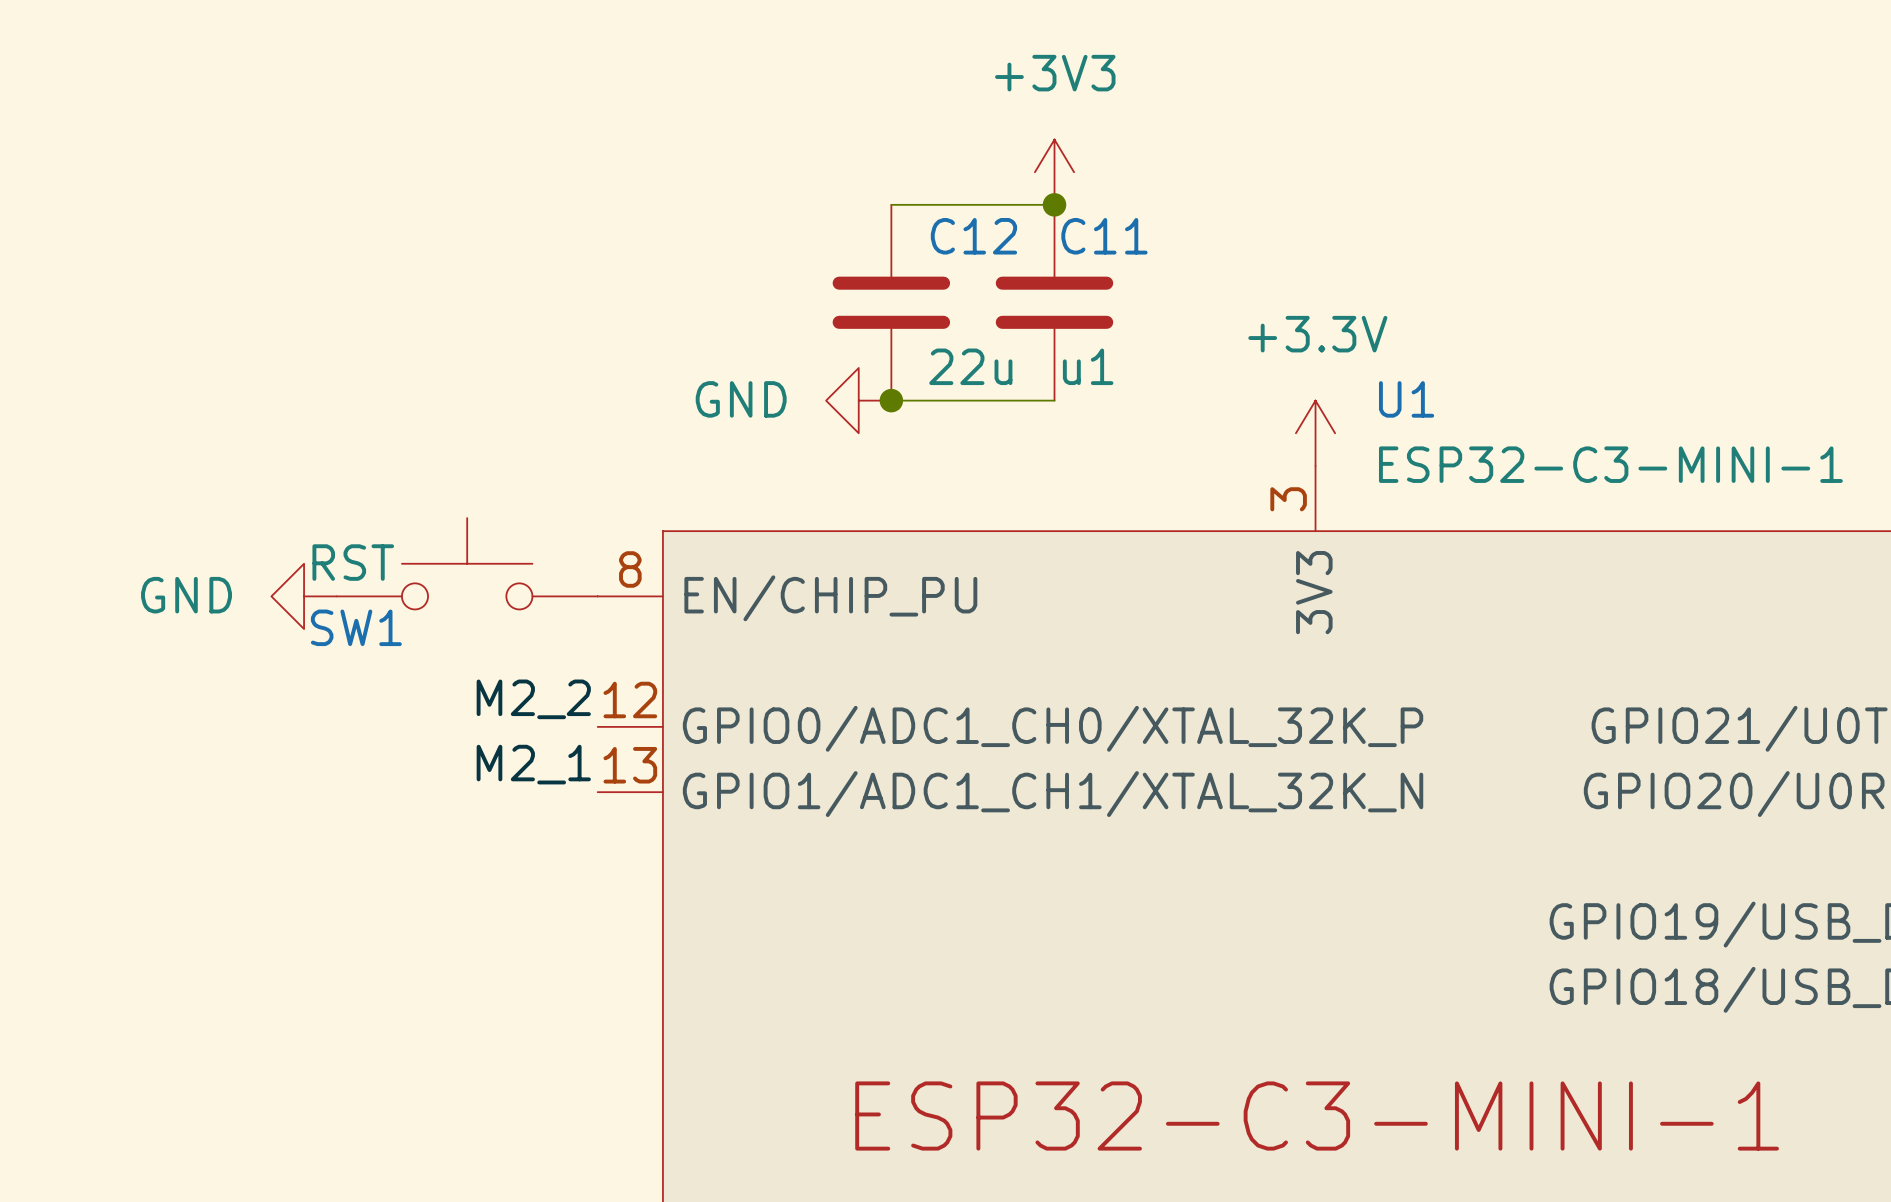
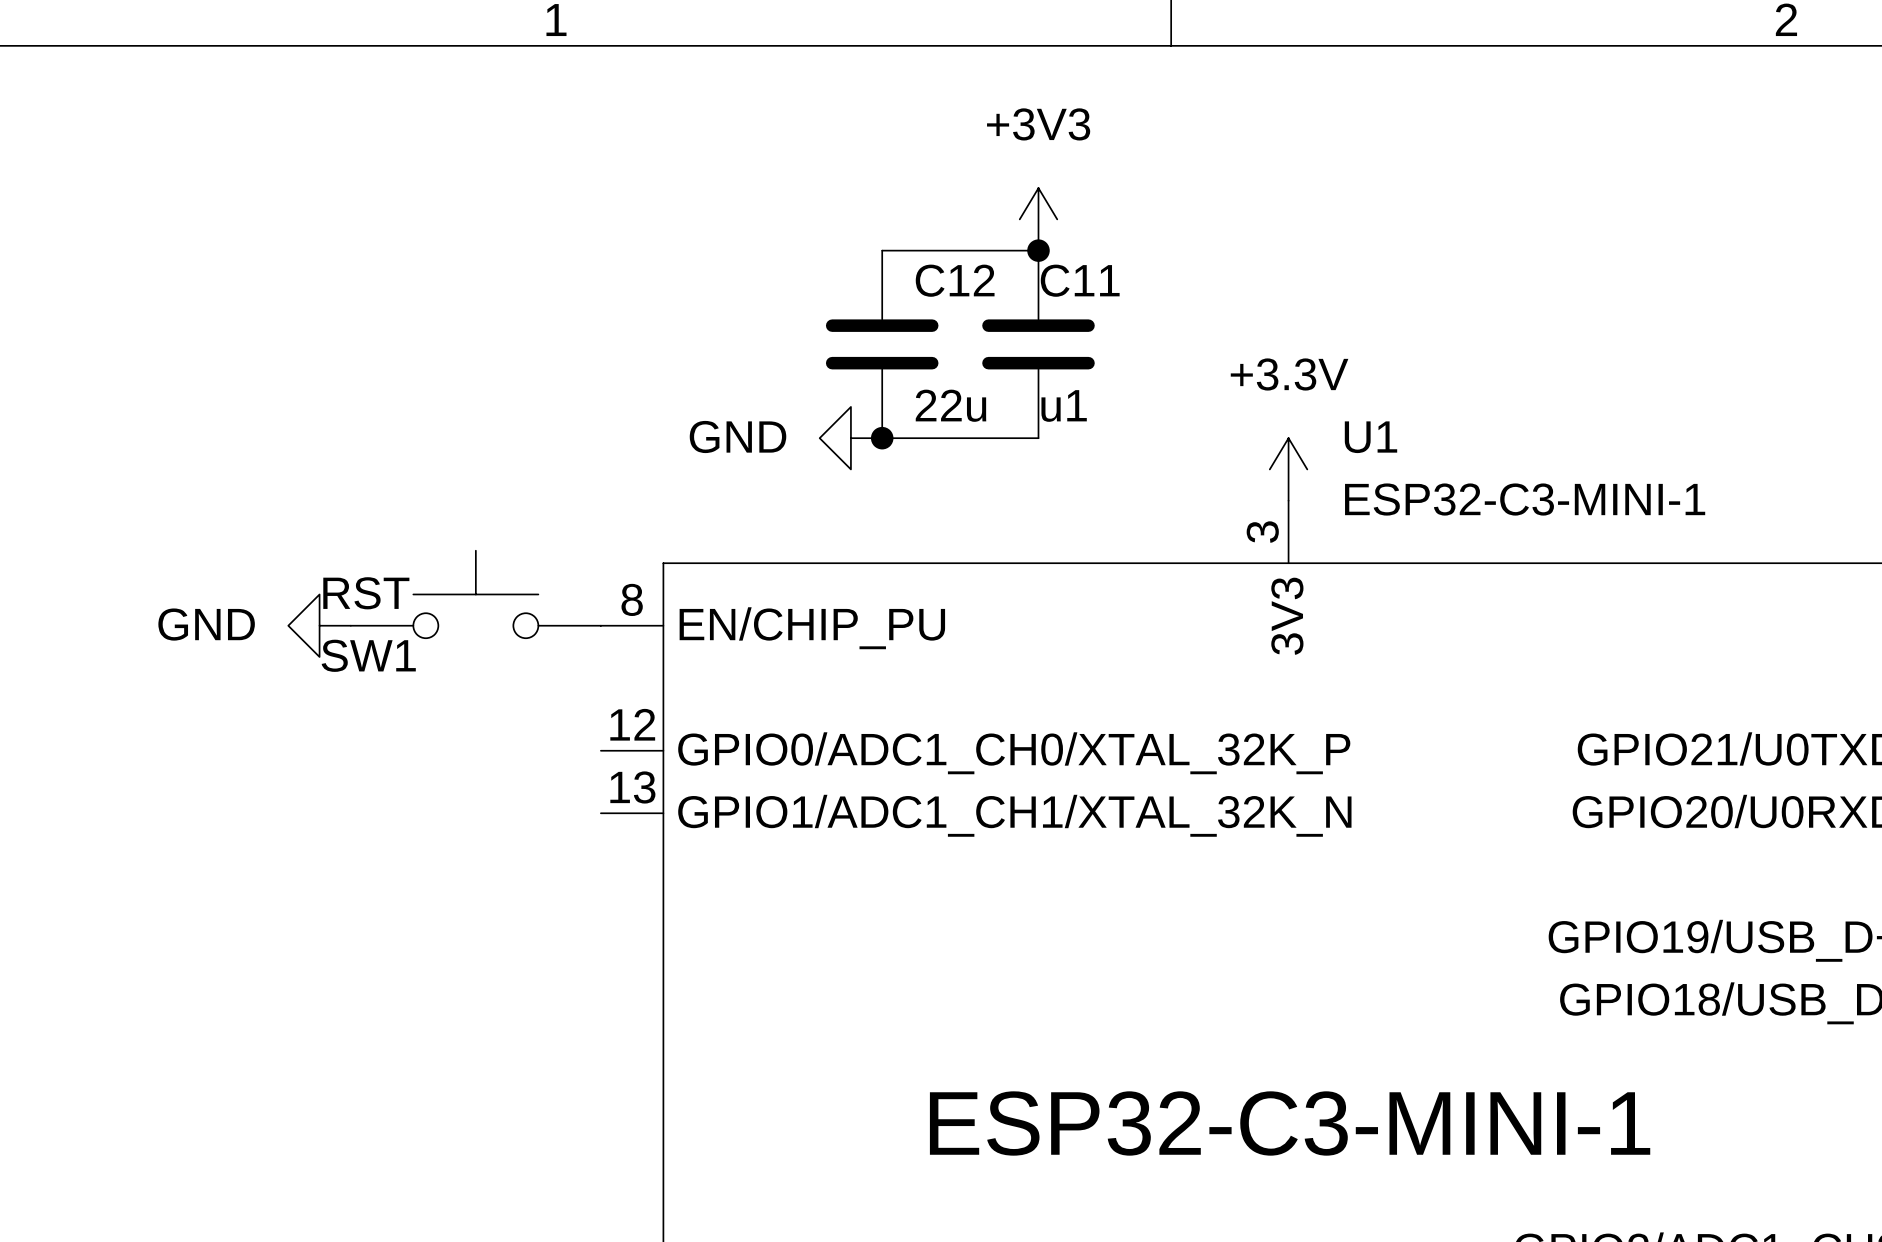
label: M2_2 (533, 699) -> none
label: M2_1 (533, 764) -> none

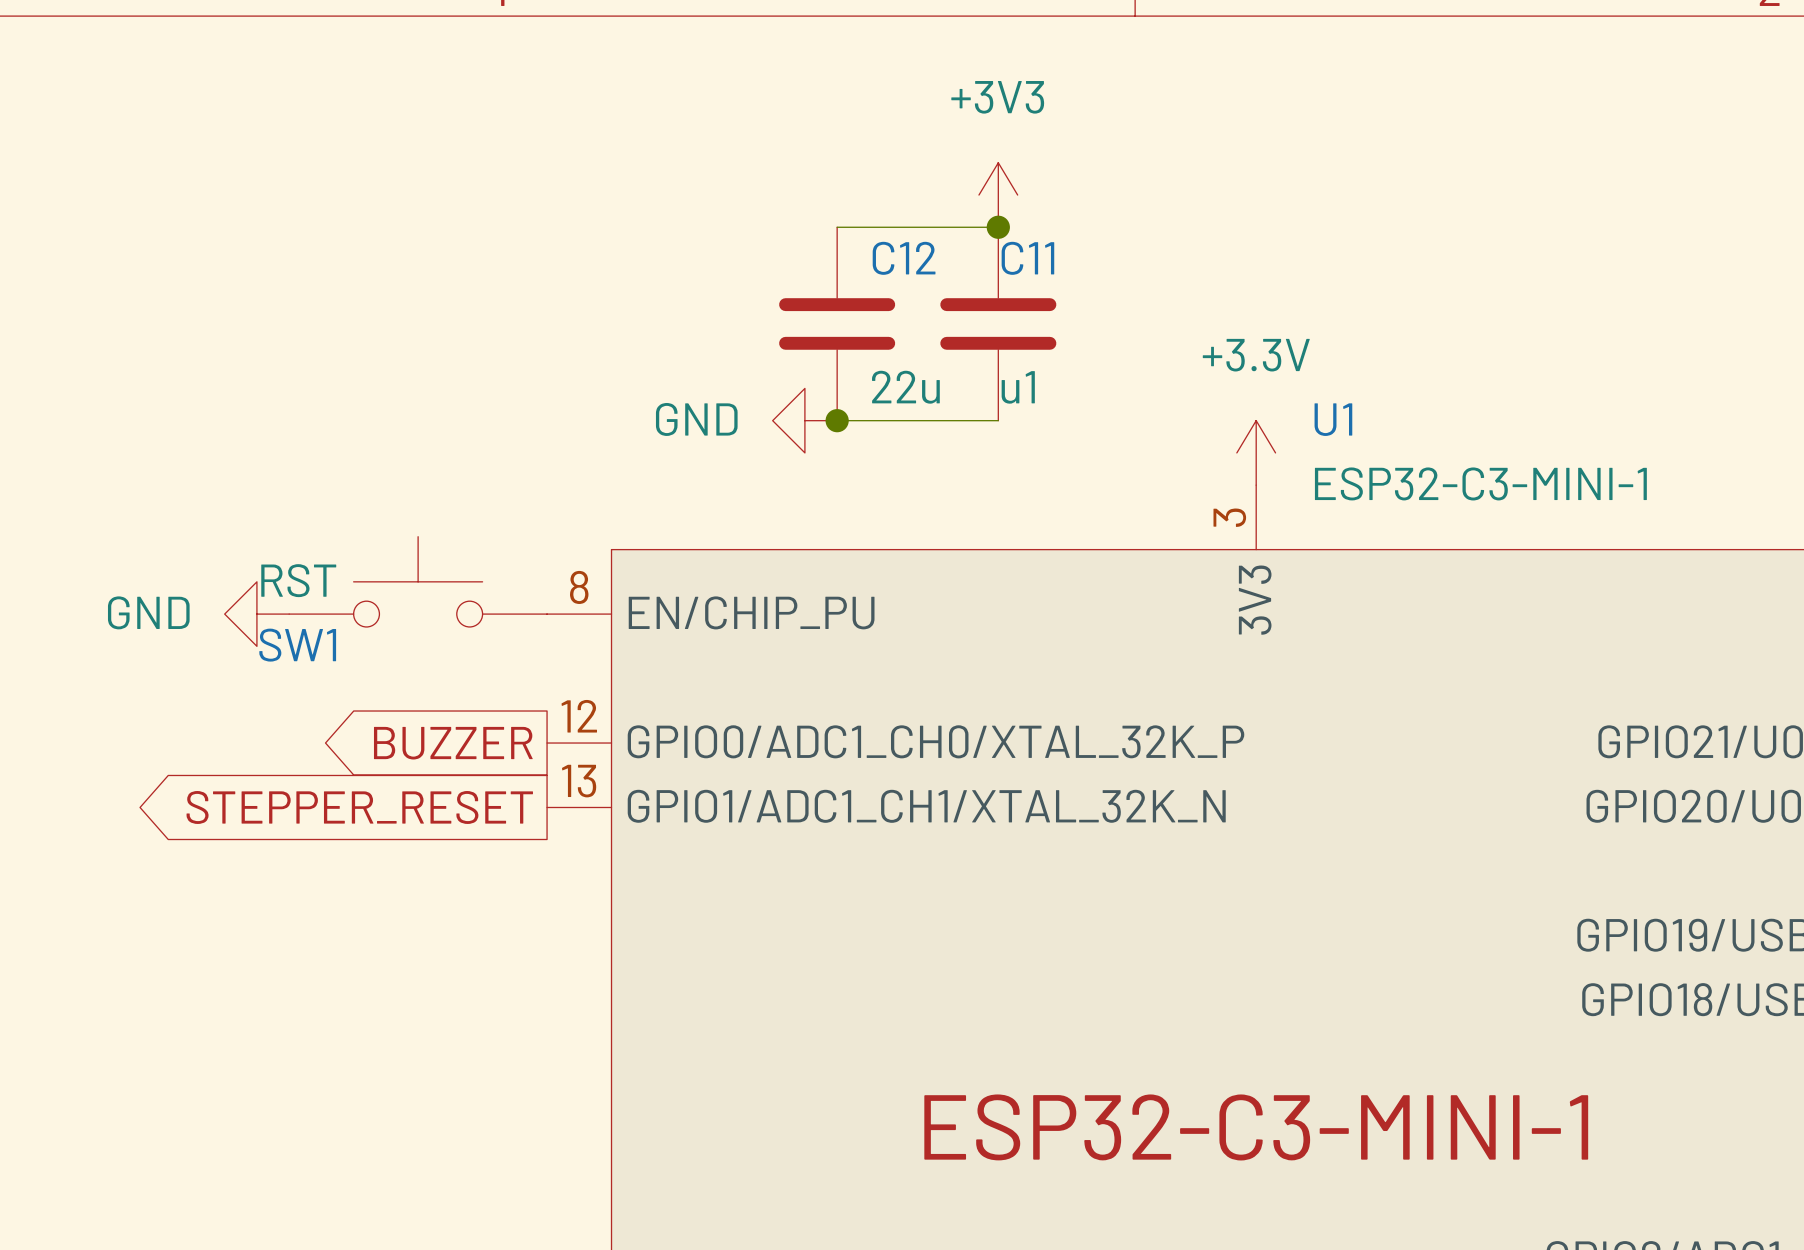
global label: none -> BUZZER (453, 743)
global label: none -> STEPPER_RESET (359, 807)

